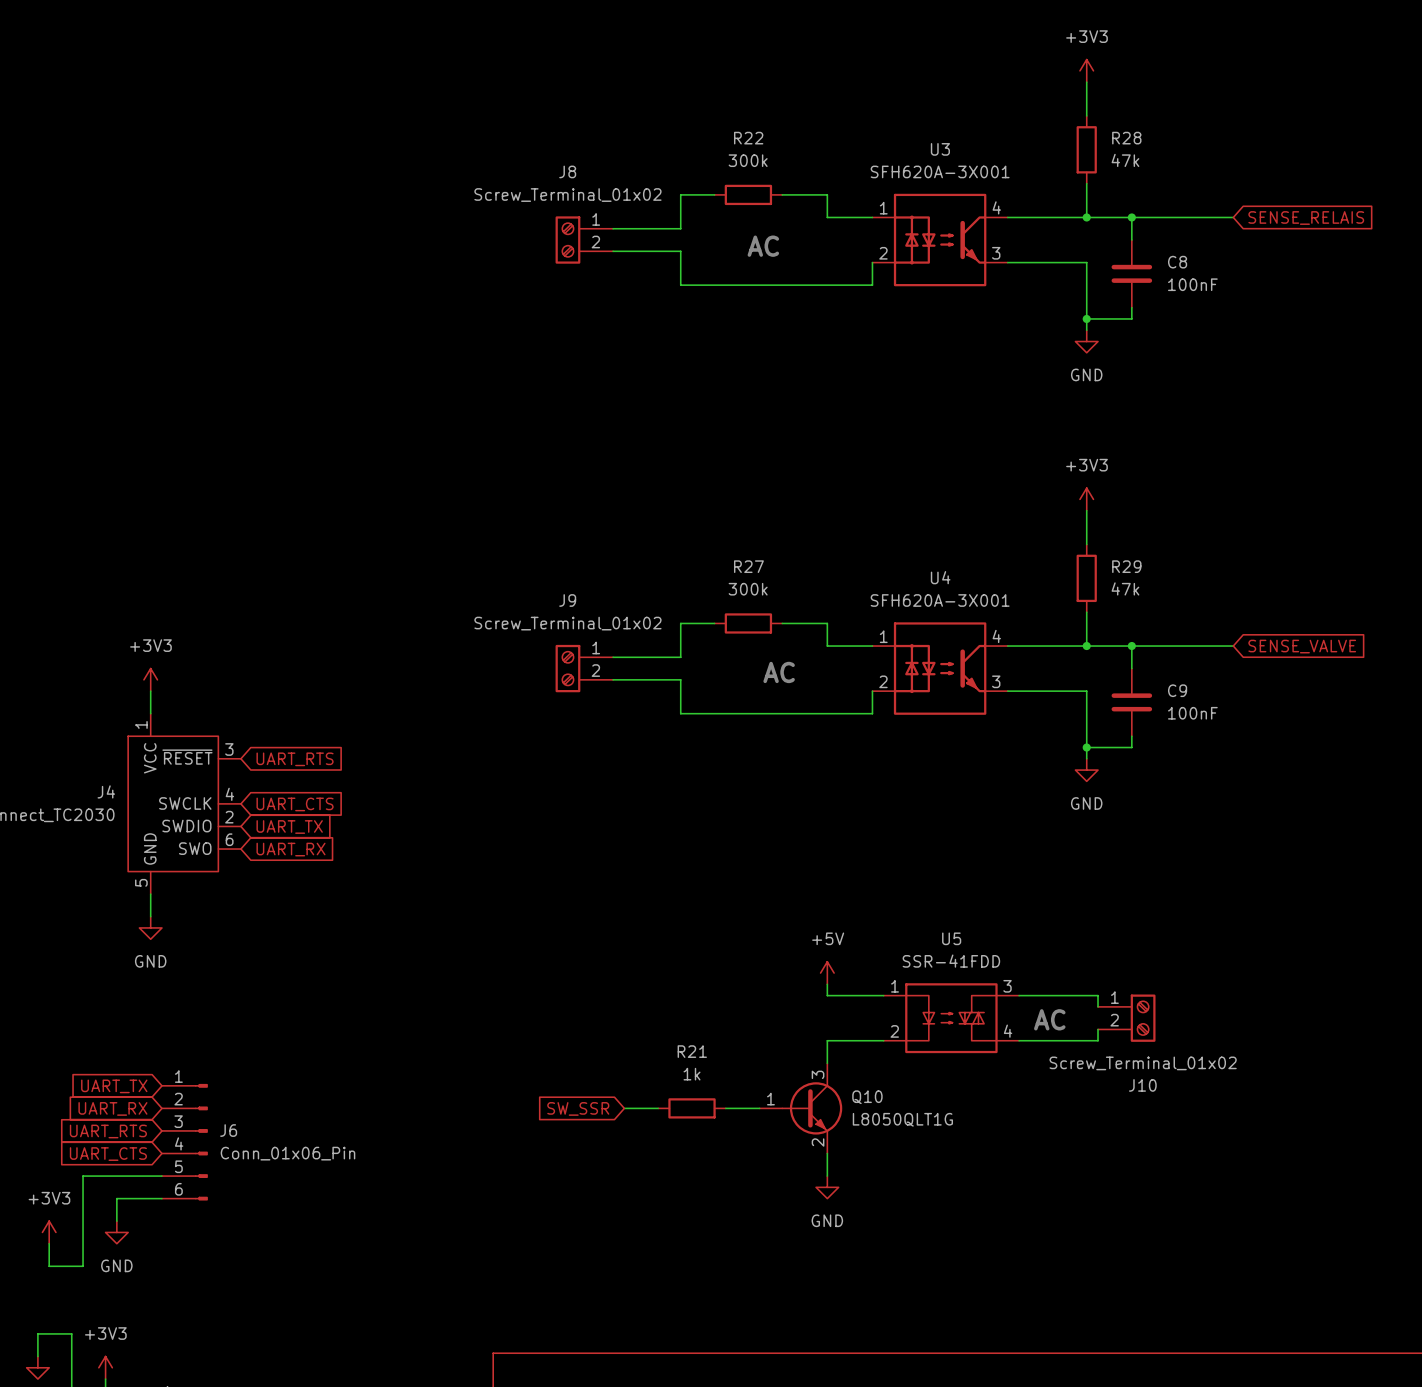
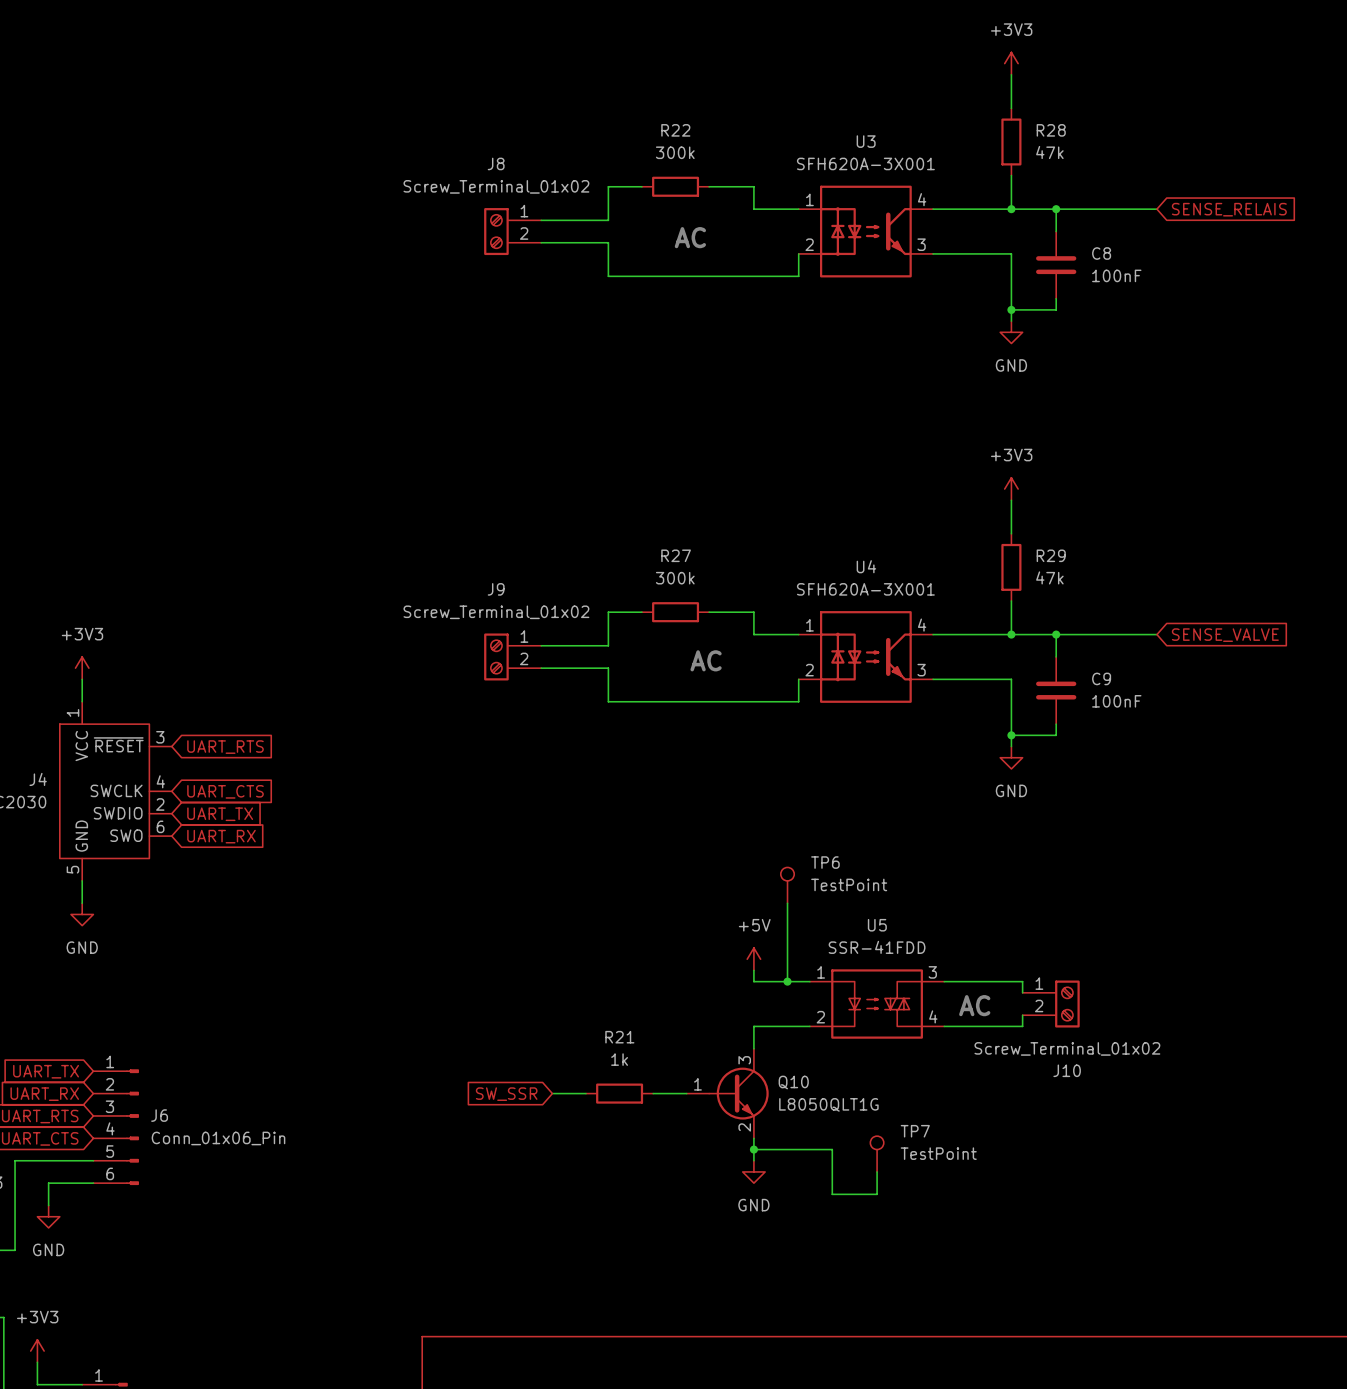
TP6: none -> TestPoint (787, 885)
wire: none -> (787, 903) (787, 981)
junction: none -> (787, 981)
wire: none -> (753, 1149) (832, 1149) (832, 1194) (877, 1194) (877, 1171)
junction: none -> (753, 1149)
TP7: none -> TestPoint (877, 1154)

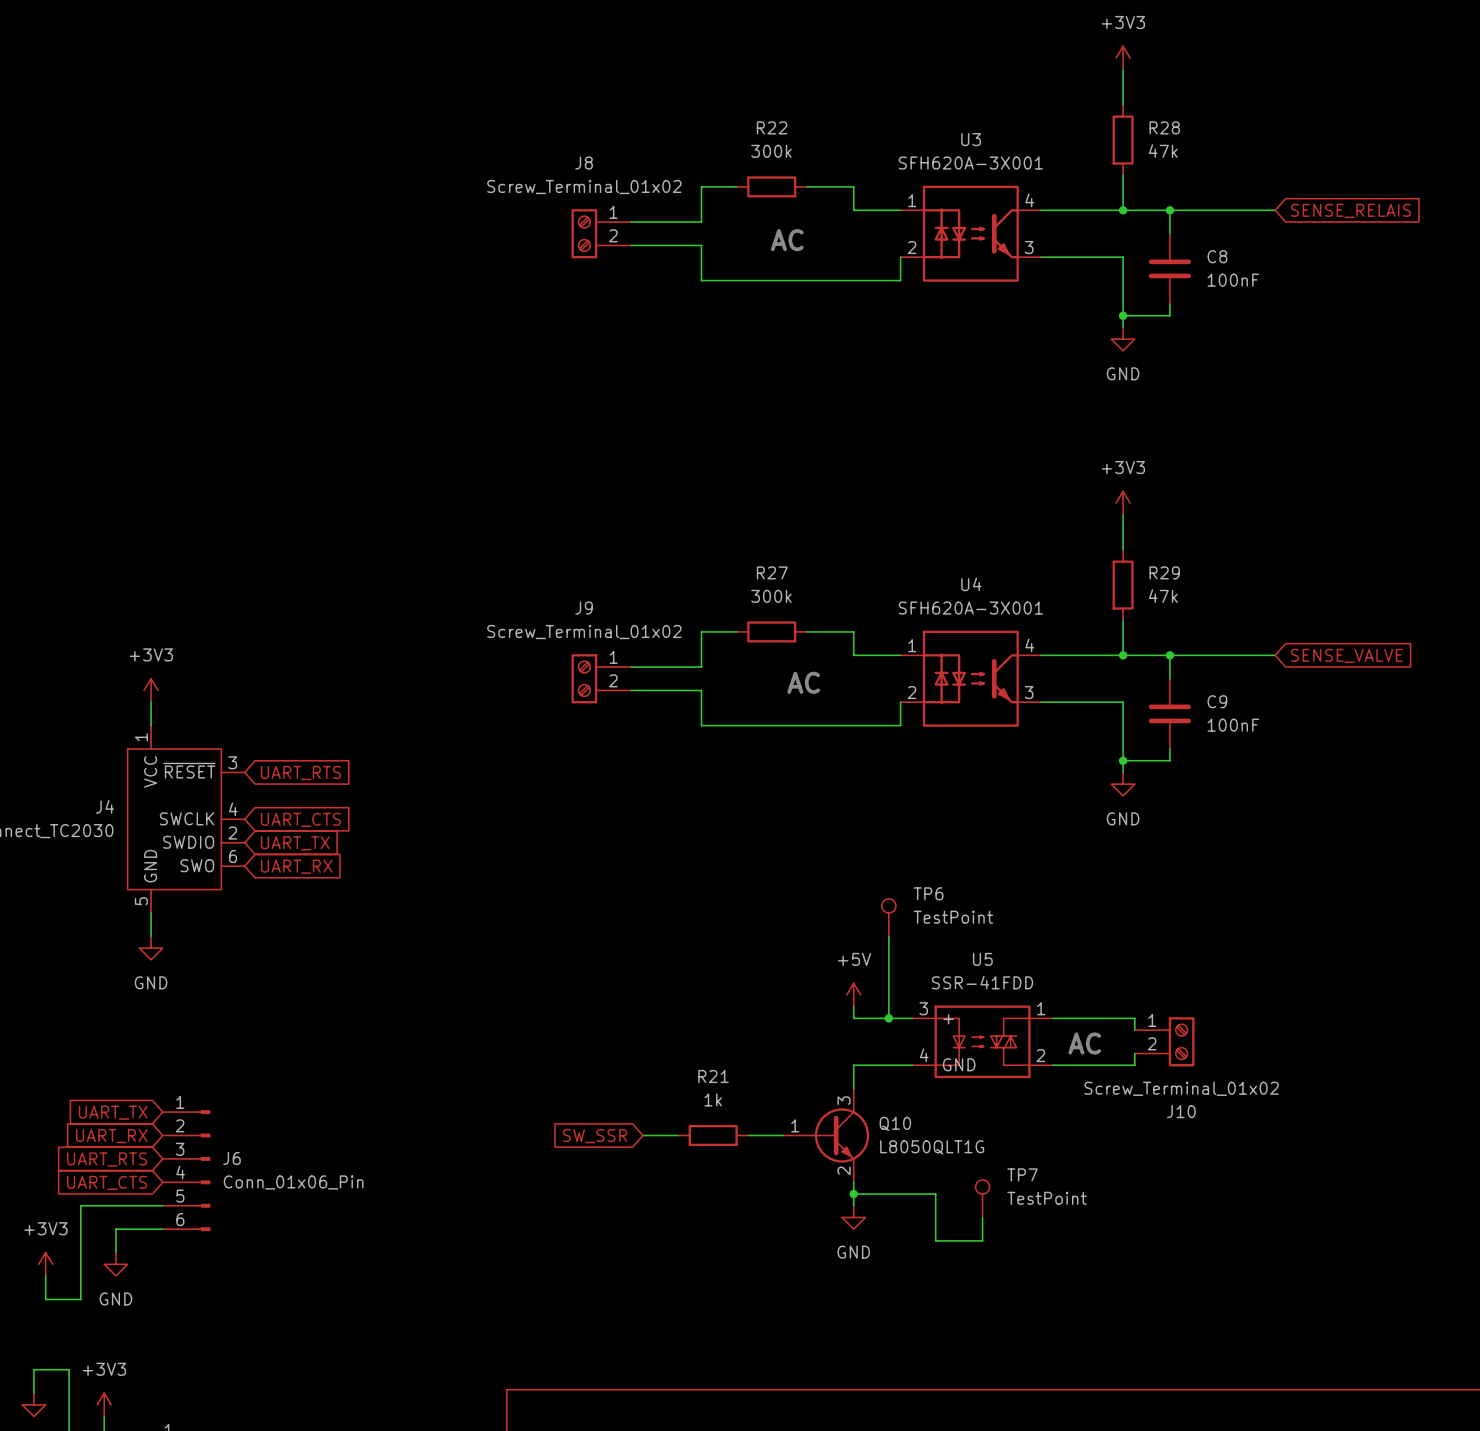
U5 pin number: 1 (821, 972) -> 3 (923, 1008)
U5 pin number: 3 (932, 972) -> 1 (1041, 1008)
U5 pin name: none -> + (948, 1019)
U5 pin number: 4 (933, 1016) -> 2 (1040, 1055)
U5 pin number: 2 (820, 1017) -> 4 (924, 1055)
U5 pin name: none -> GND (959, 1064)

